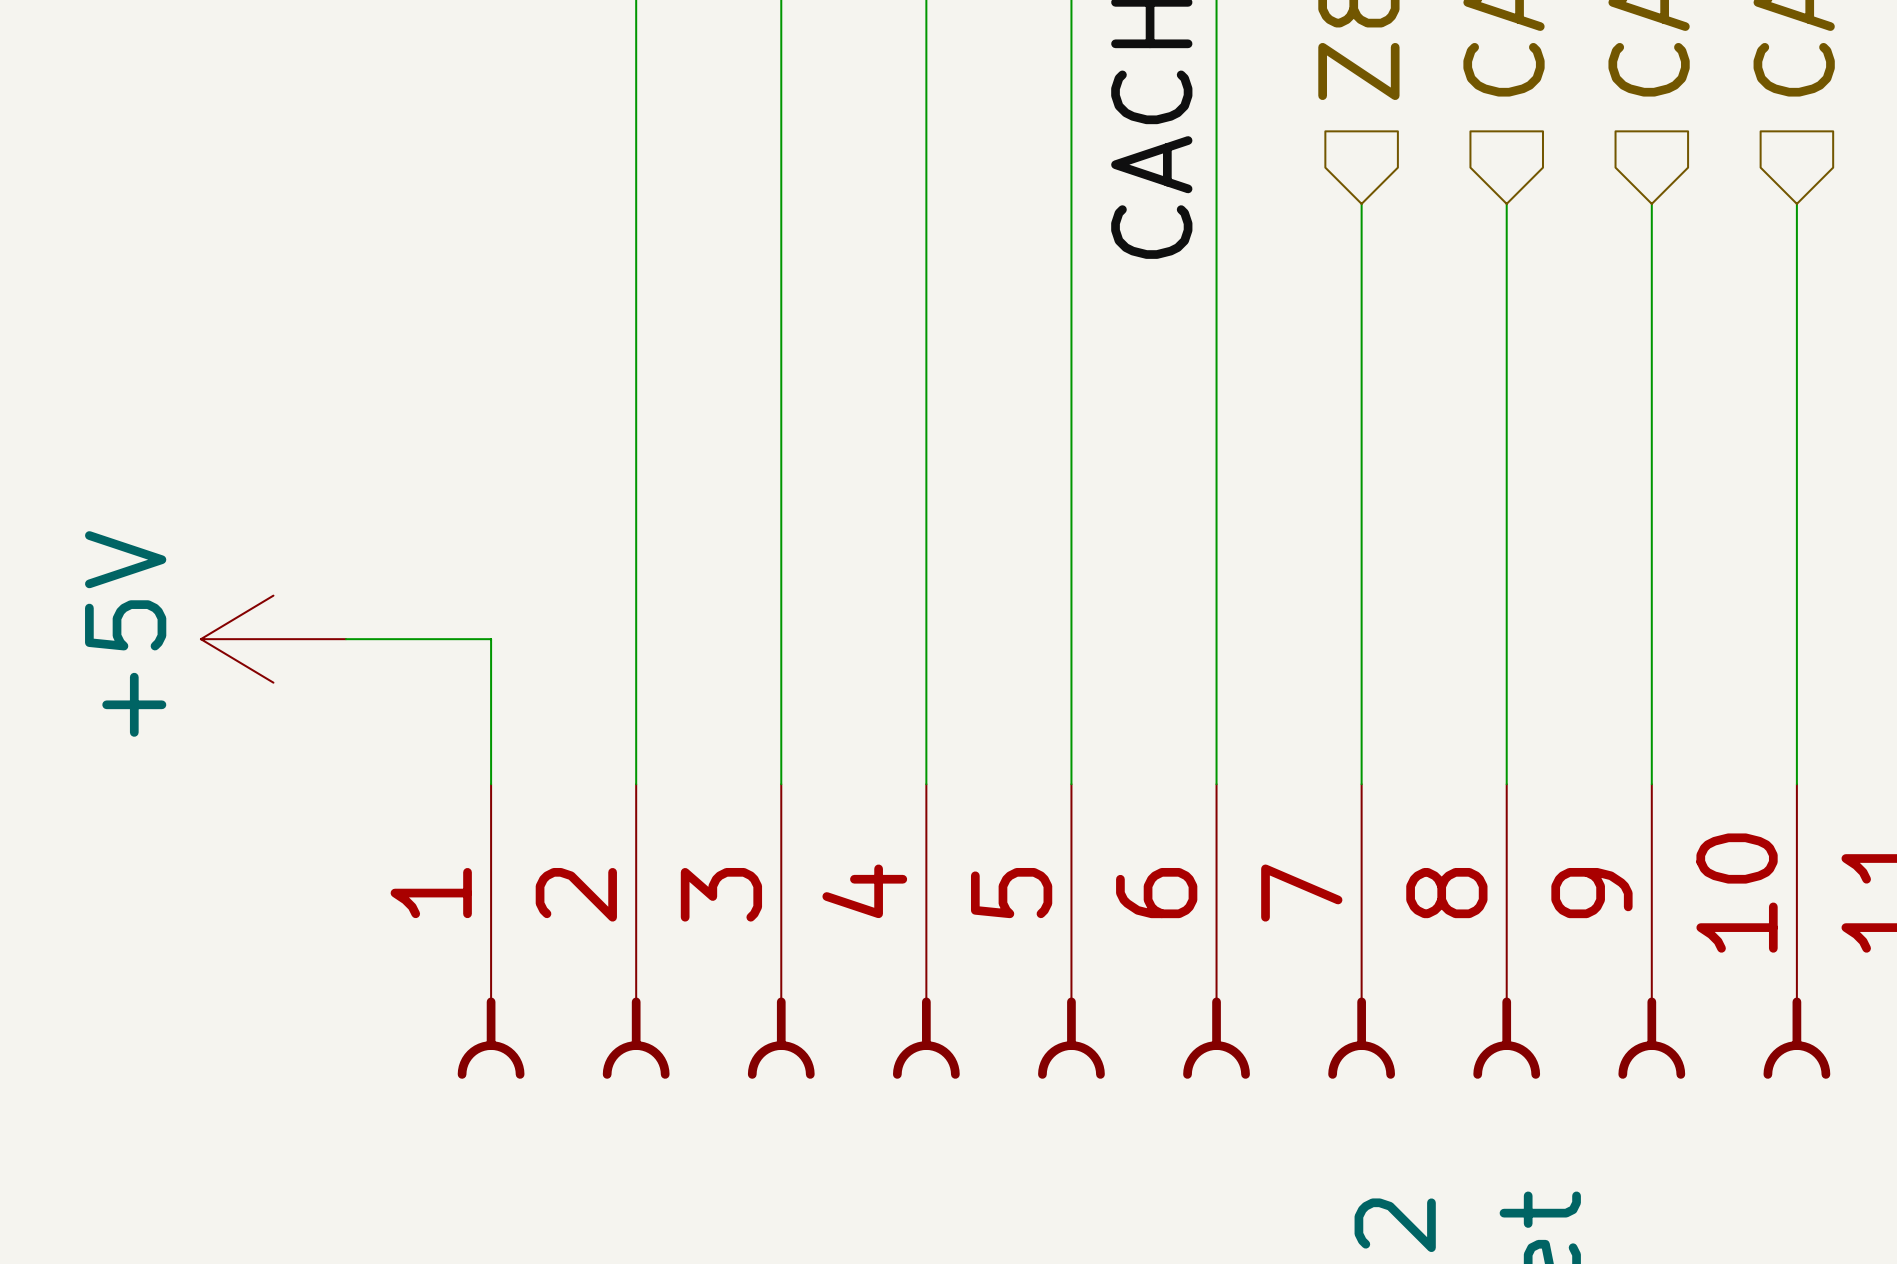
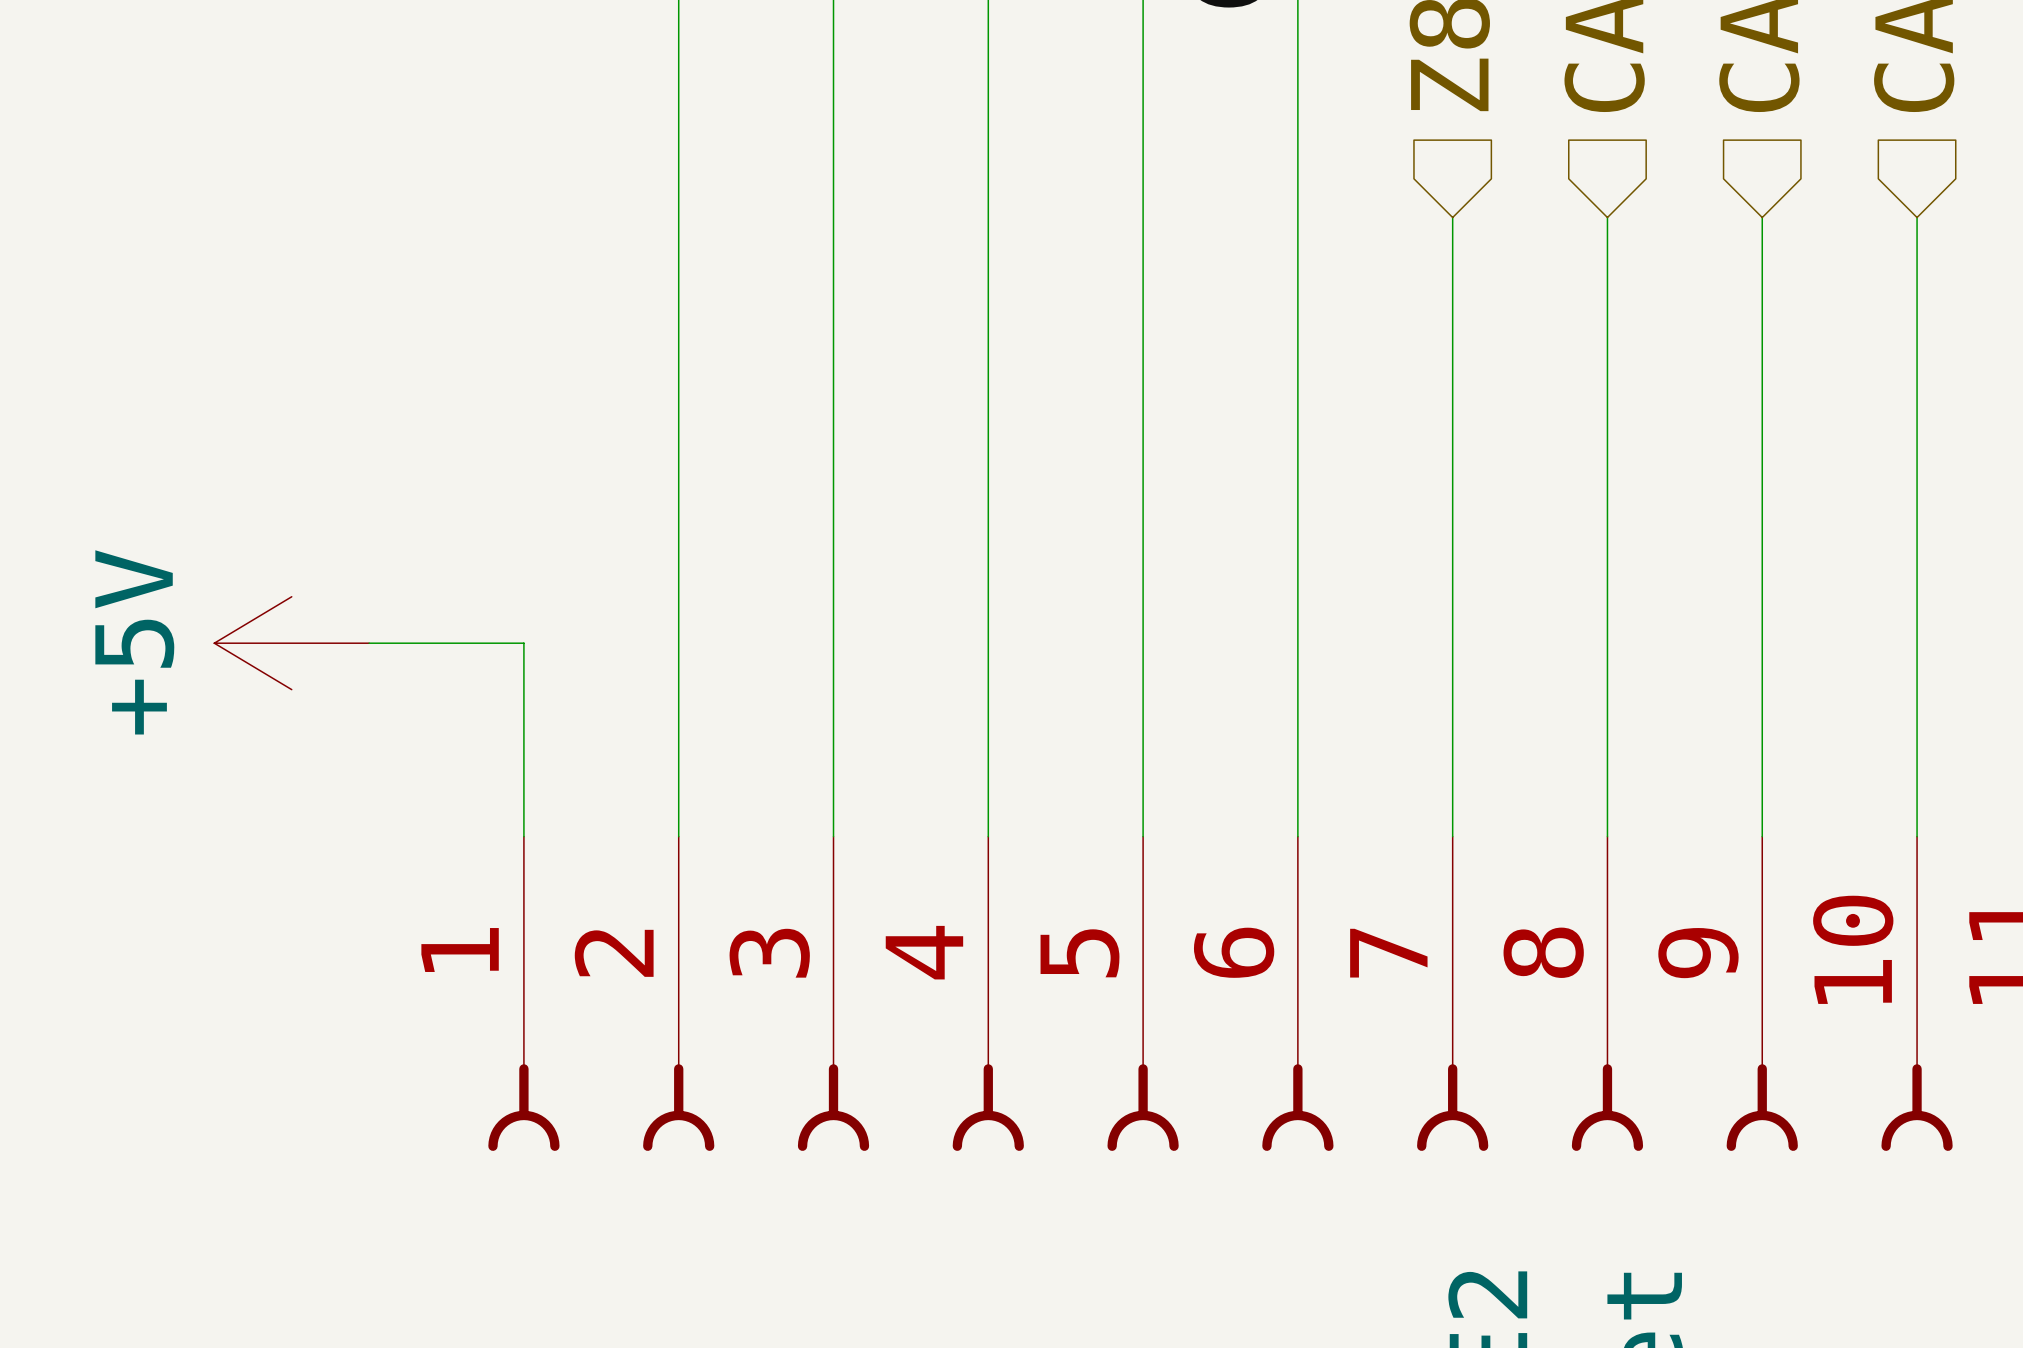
power symbol position: +5V (273, 639) -> +5V (291, 643)
wire: (346, 639) (491, 639) -> (369, 643) (523, 643) (523, 681)

